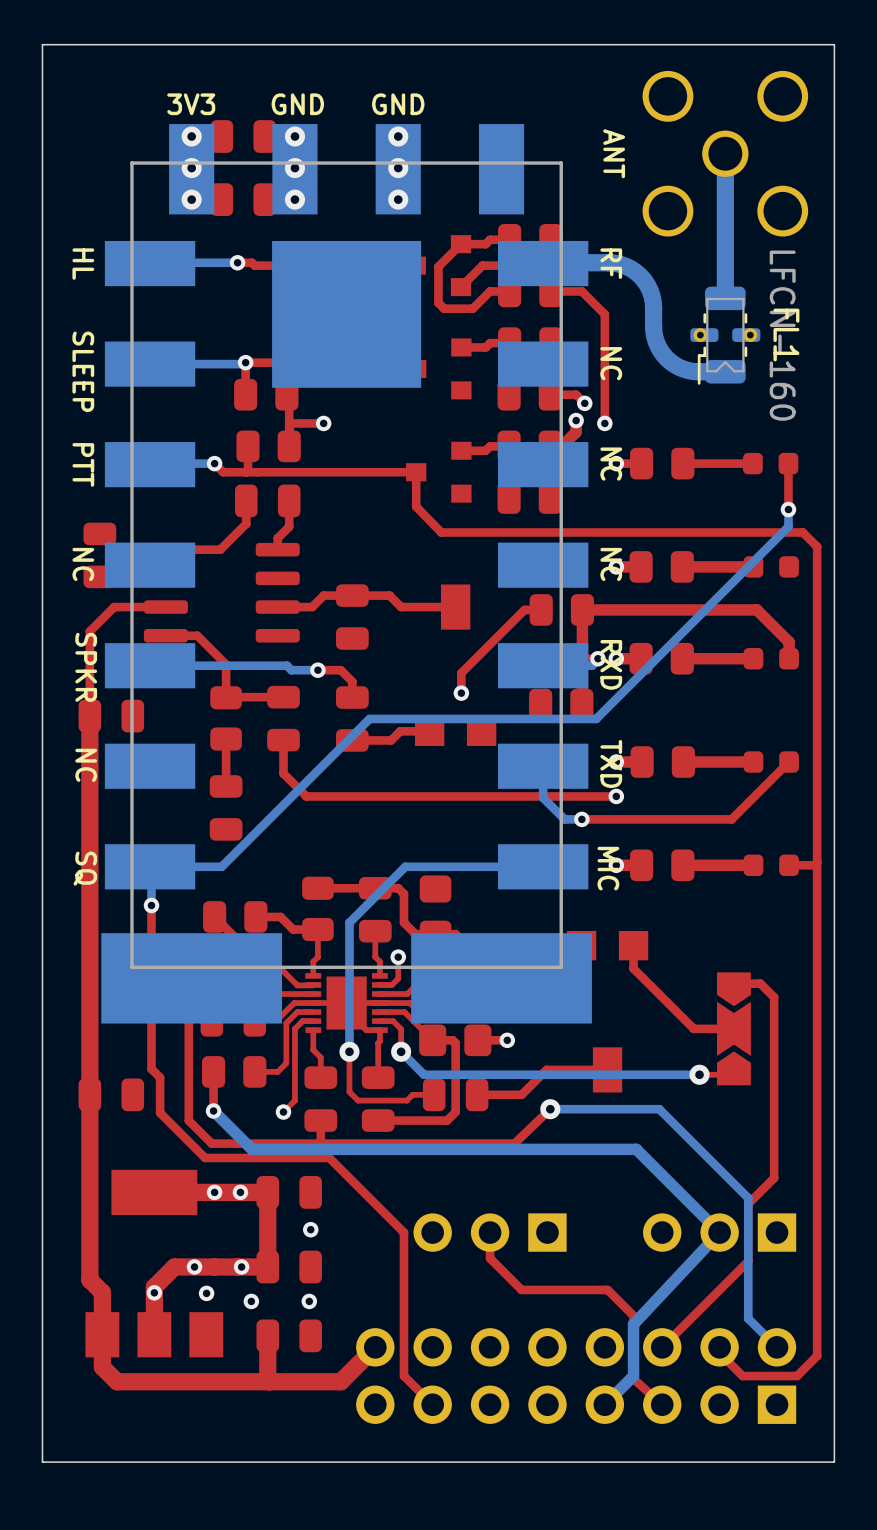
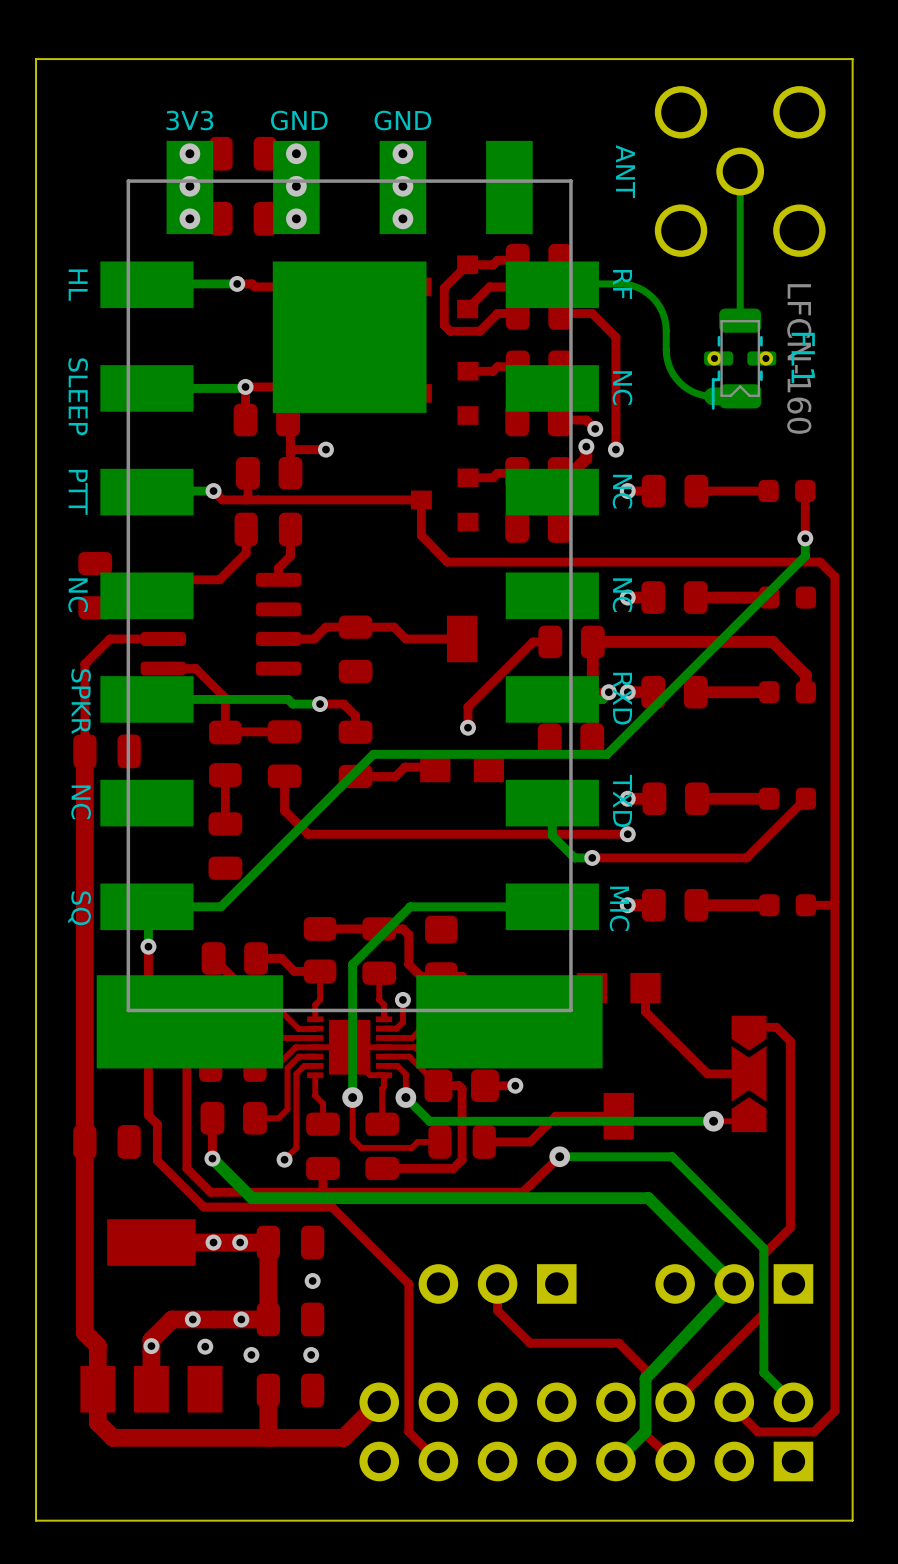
bottom track width: thick (725, 153) (725, 298) -> thin (740, 171) (740, 320)
bottom track width: thick (543, 262) (614, 263) (625, 266) (635, 272) (647, 285) (652, 296) (653, 331) (660, 350) (674, 364) (683, 369) (698, 371) -> thin (553, 283) (625, 284) (637, 287) (648, 293) (659, 307) (664, 318) (666, 354) (673, 374) (688, 389) (697, 393) (712, 396)

